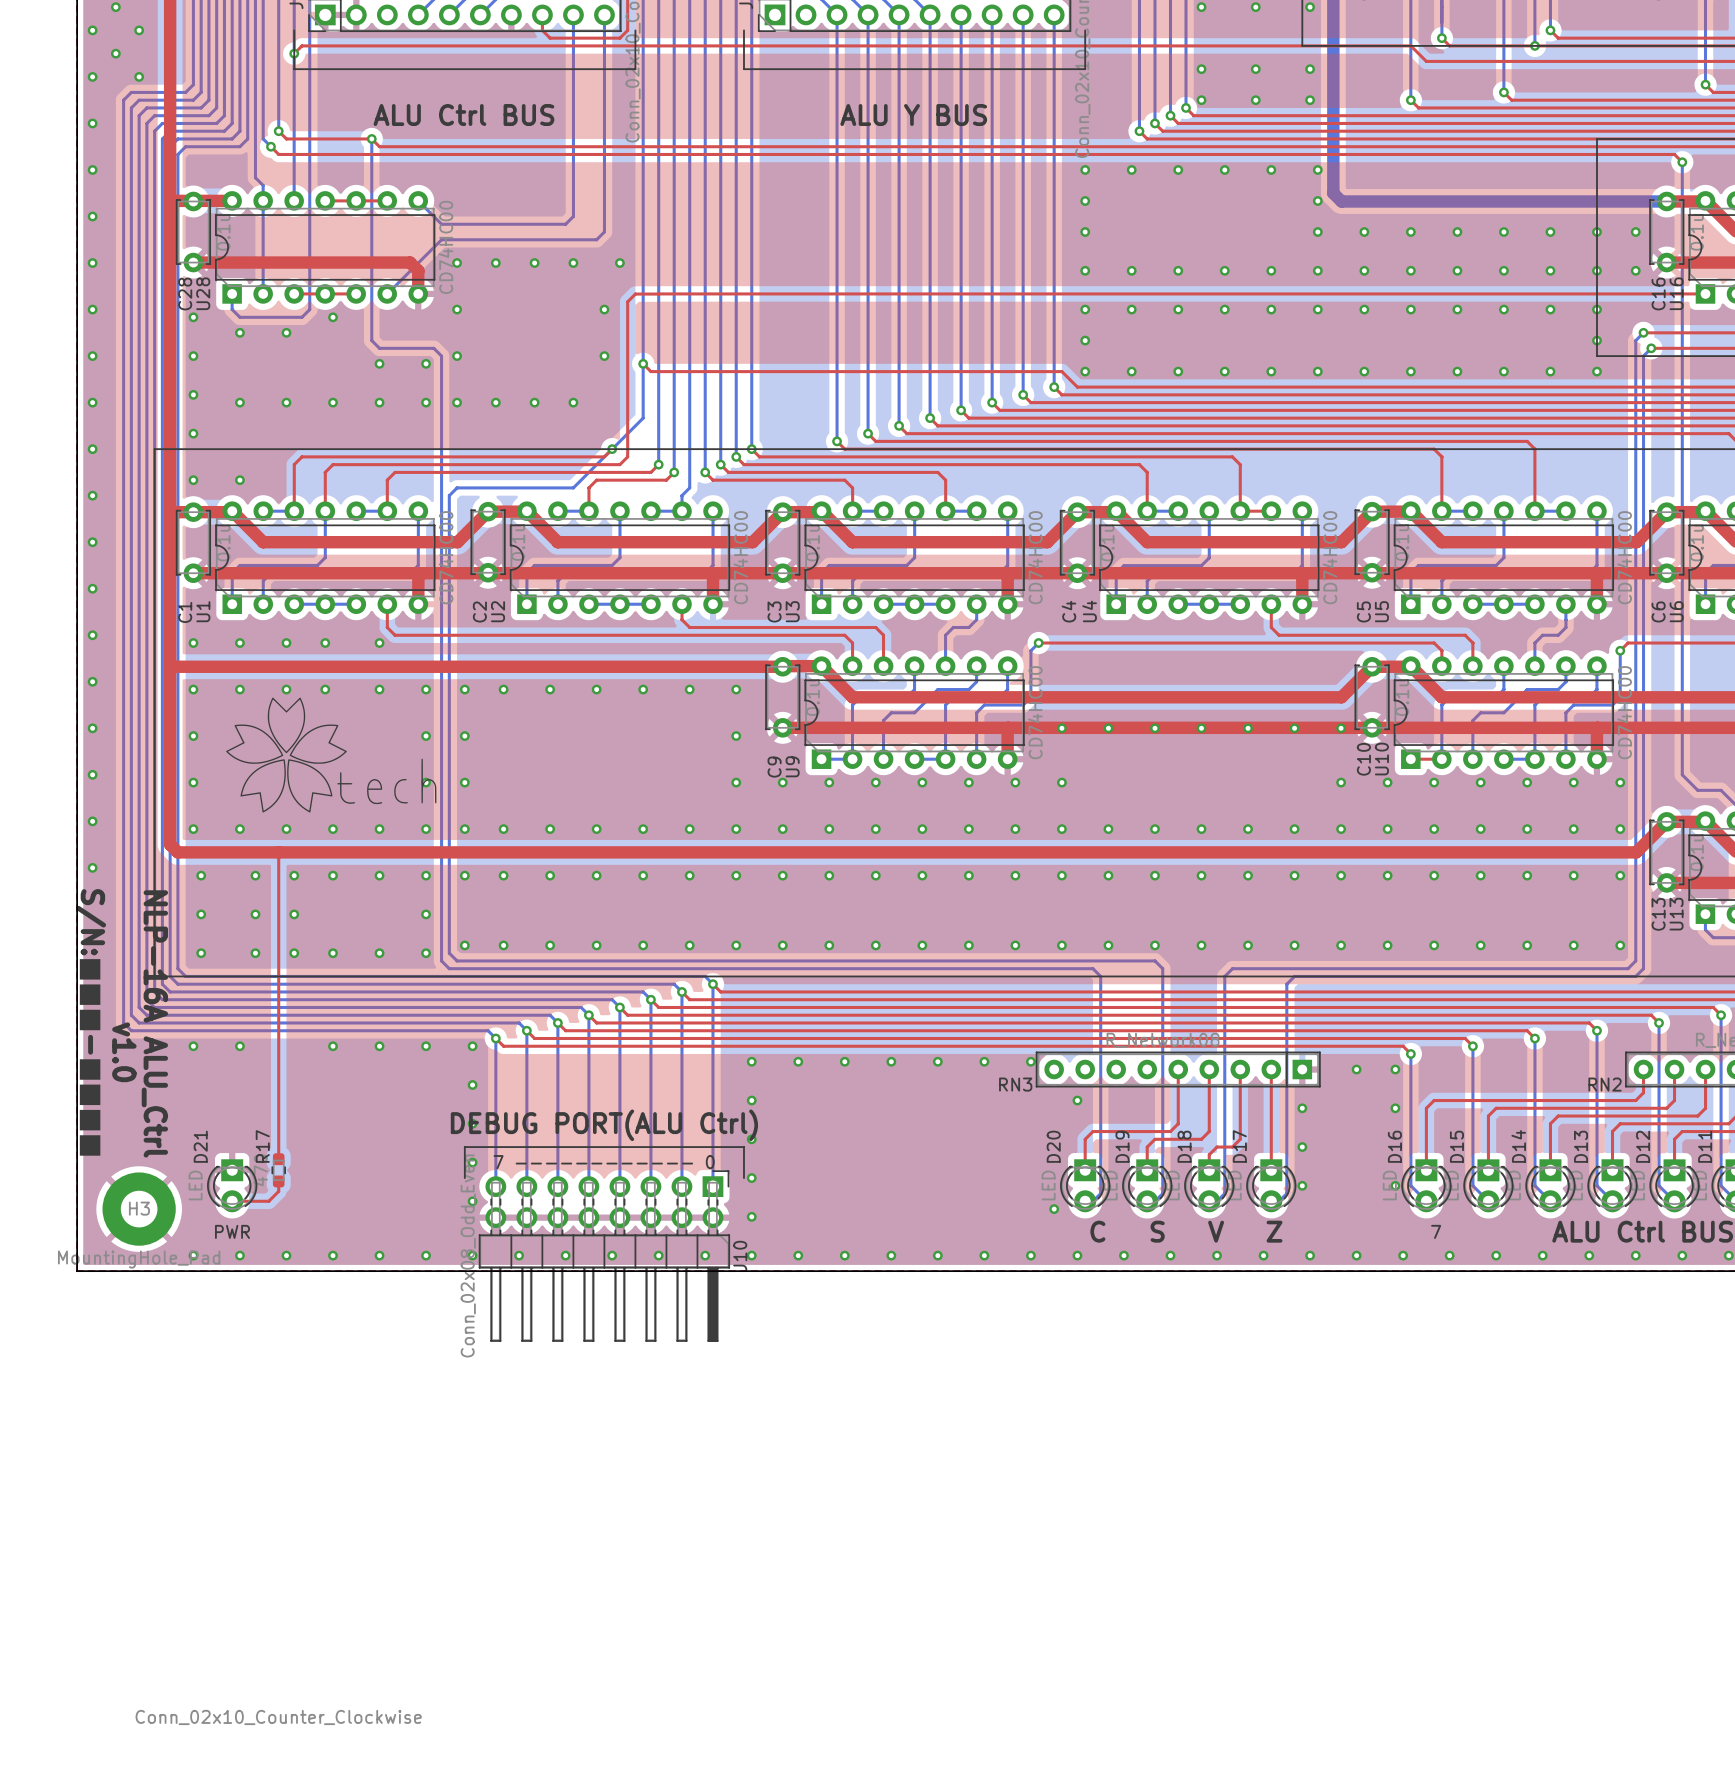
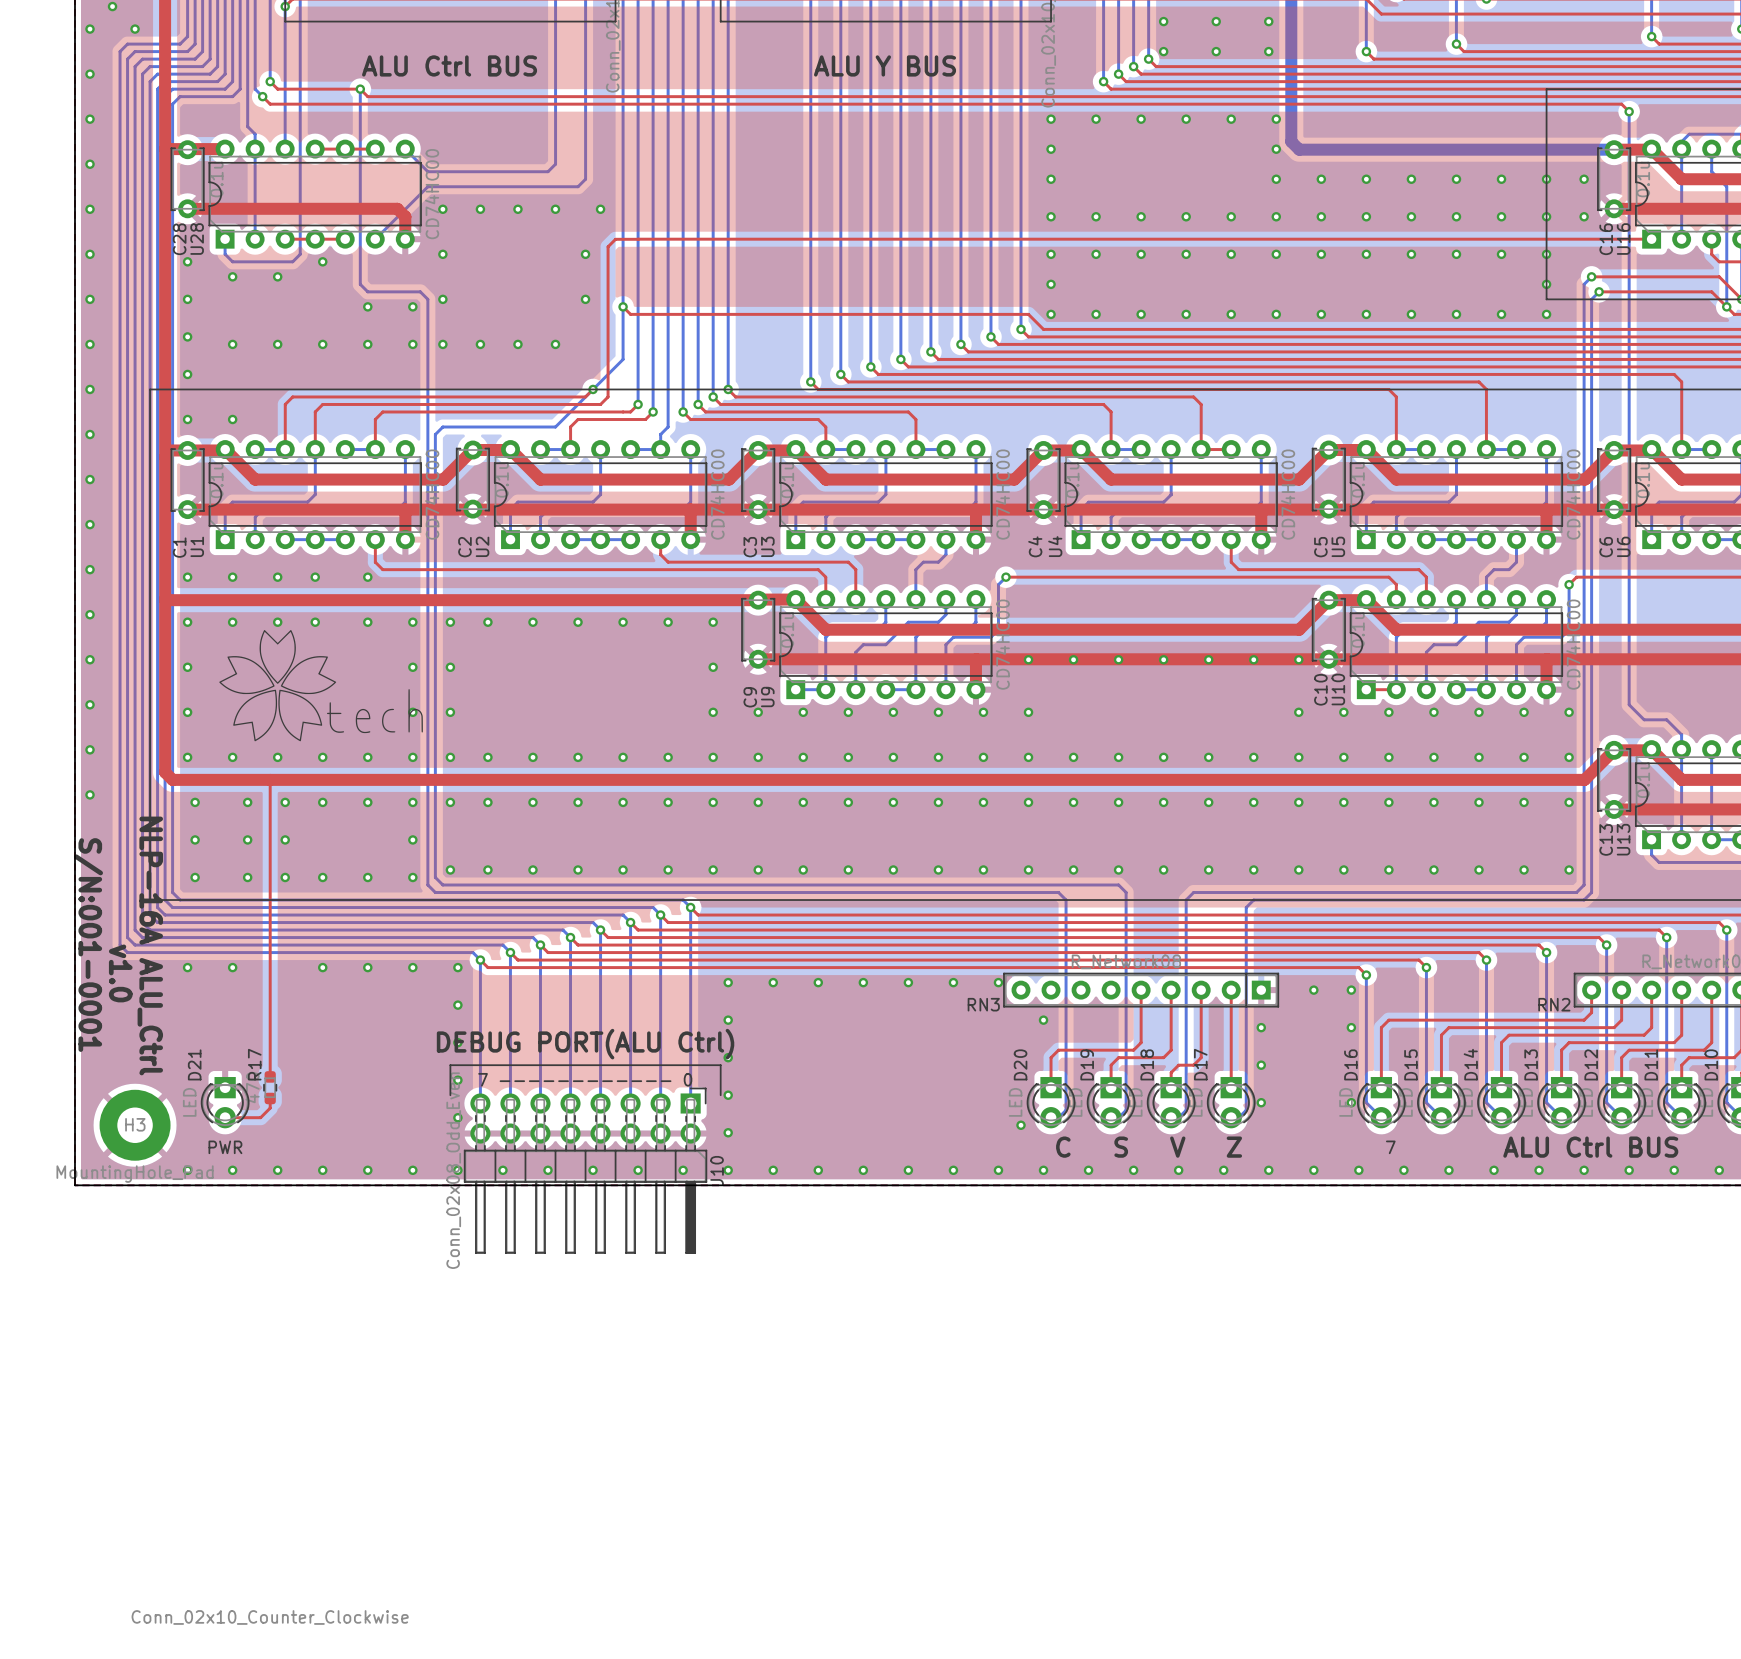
text: S/N:■■■-■■■■ (91, 1023) -> S/N:001-0001 (88, 945)

